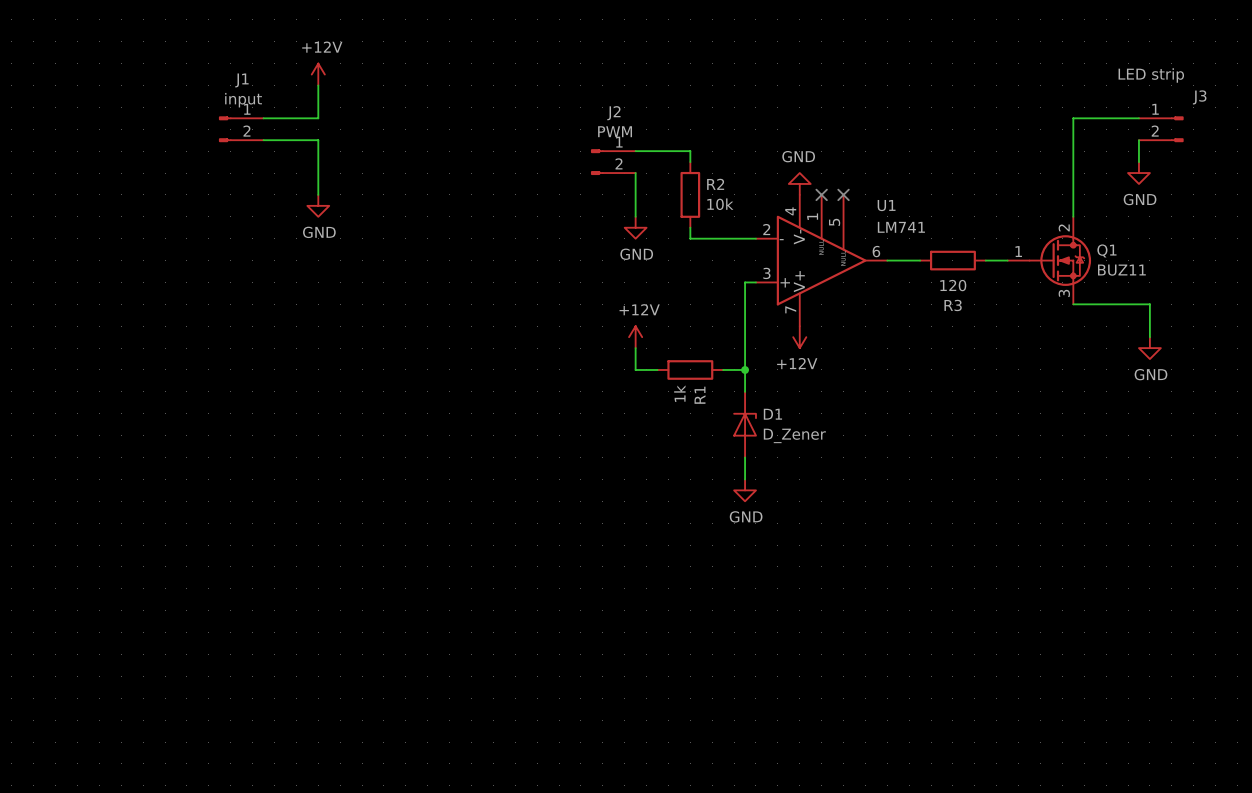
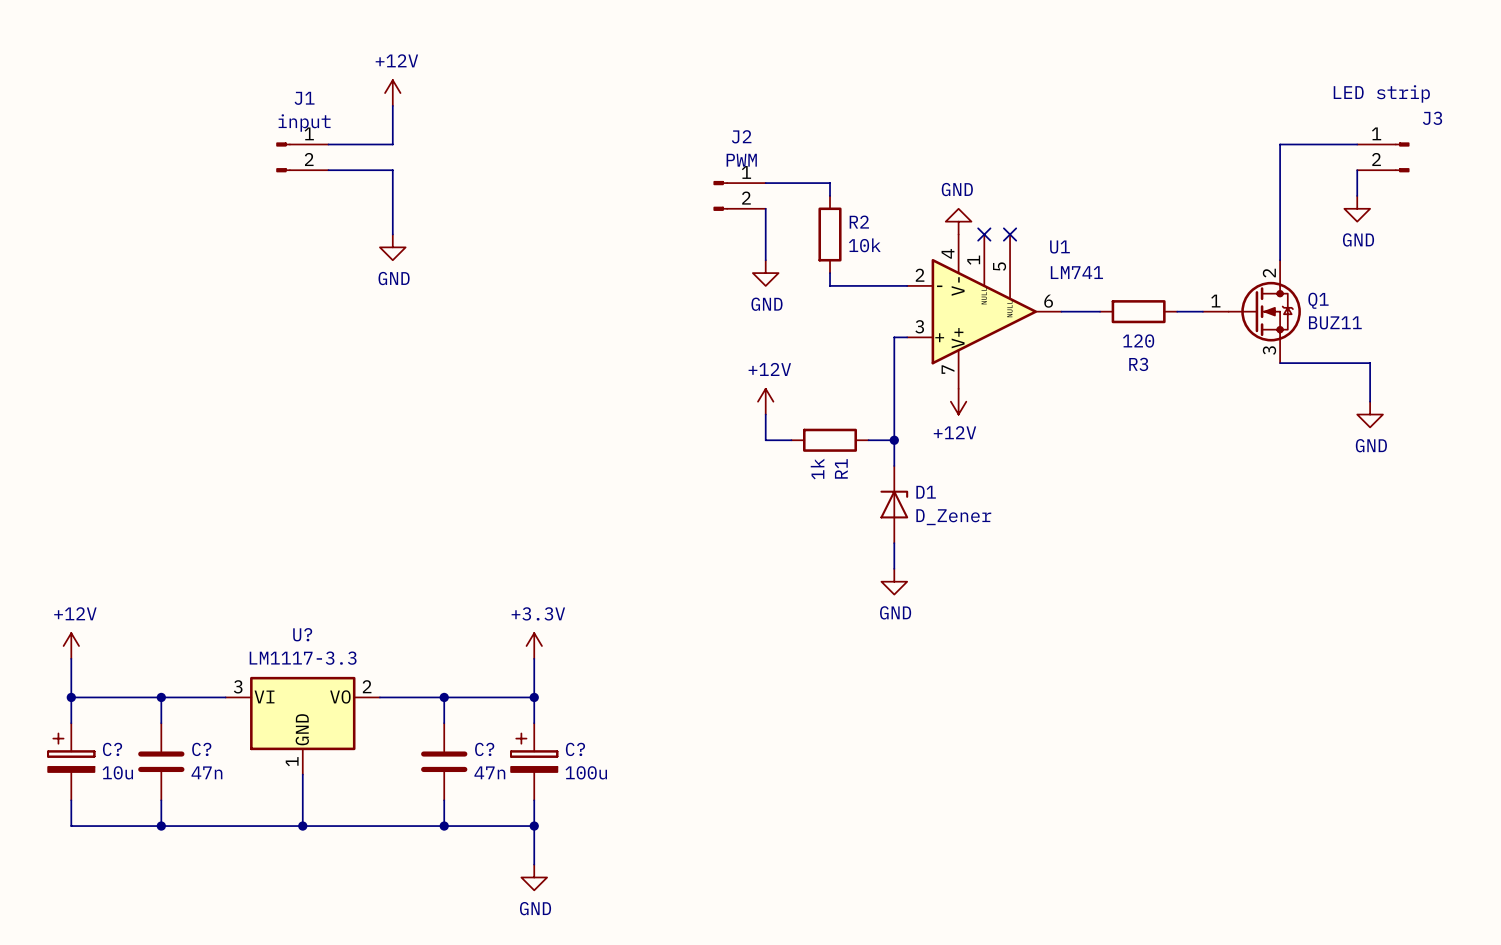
power symbol: none -> +12V (71, 646)
power symbol: none -> +3.3V (534, 646)
wire: none -> (71, 658) (71, 723)
wire: none -> (534, 658) (534, 723)
wire: none -> (71, 697) (225, 697)
junction: none -> (71, 697)
wire: none -> (161, 697) (161, 723)
junction: none -> (161, 697)
wire: none -> (379, 697) (534, 697)
wire: none -> (444, 697) (444, 723)
junction: none -> (444, 697)
junction: none -> (534, 697)
U?: none -> LM1117-3.3 (302, 725)
C?: none -> 10u (71, 761)
C?: none -> 47n (161, 761)
C?: none -> 47n (444, 761)
C?: none -> 100u (534, 761)
wire: none -> (302, 774) (302, 826)
wire: none -> (71, 800) (71, 826) (534, 826)
wire: none -> (161, 800) (161, 826)
wire: none -> (444, 800) (444, 826)
wire: none -> (534, 800) (534, 864)
junction: none -> (161, 826)
junction: none -> (302, 826)
junction: none -> (444, 826)
junction: none -> (534, 826)
power symbol: none -> GND (534, 877)

